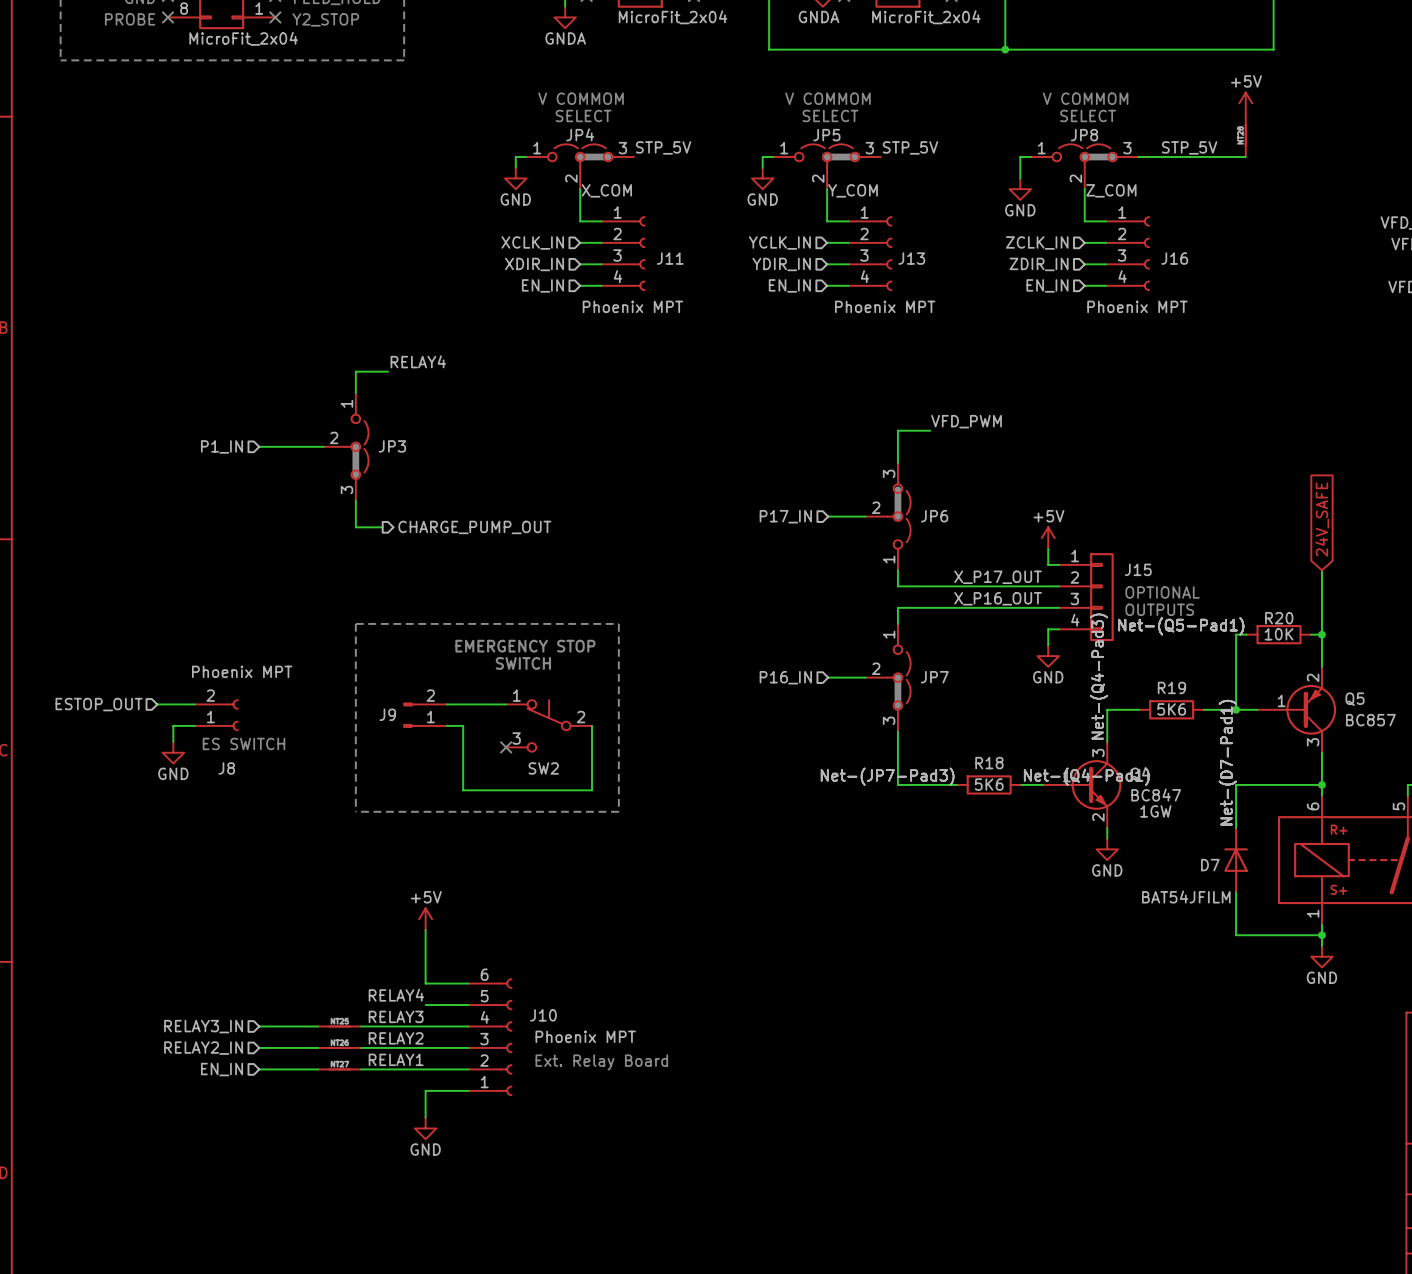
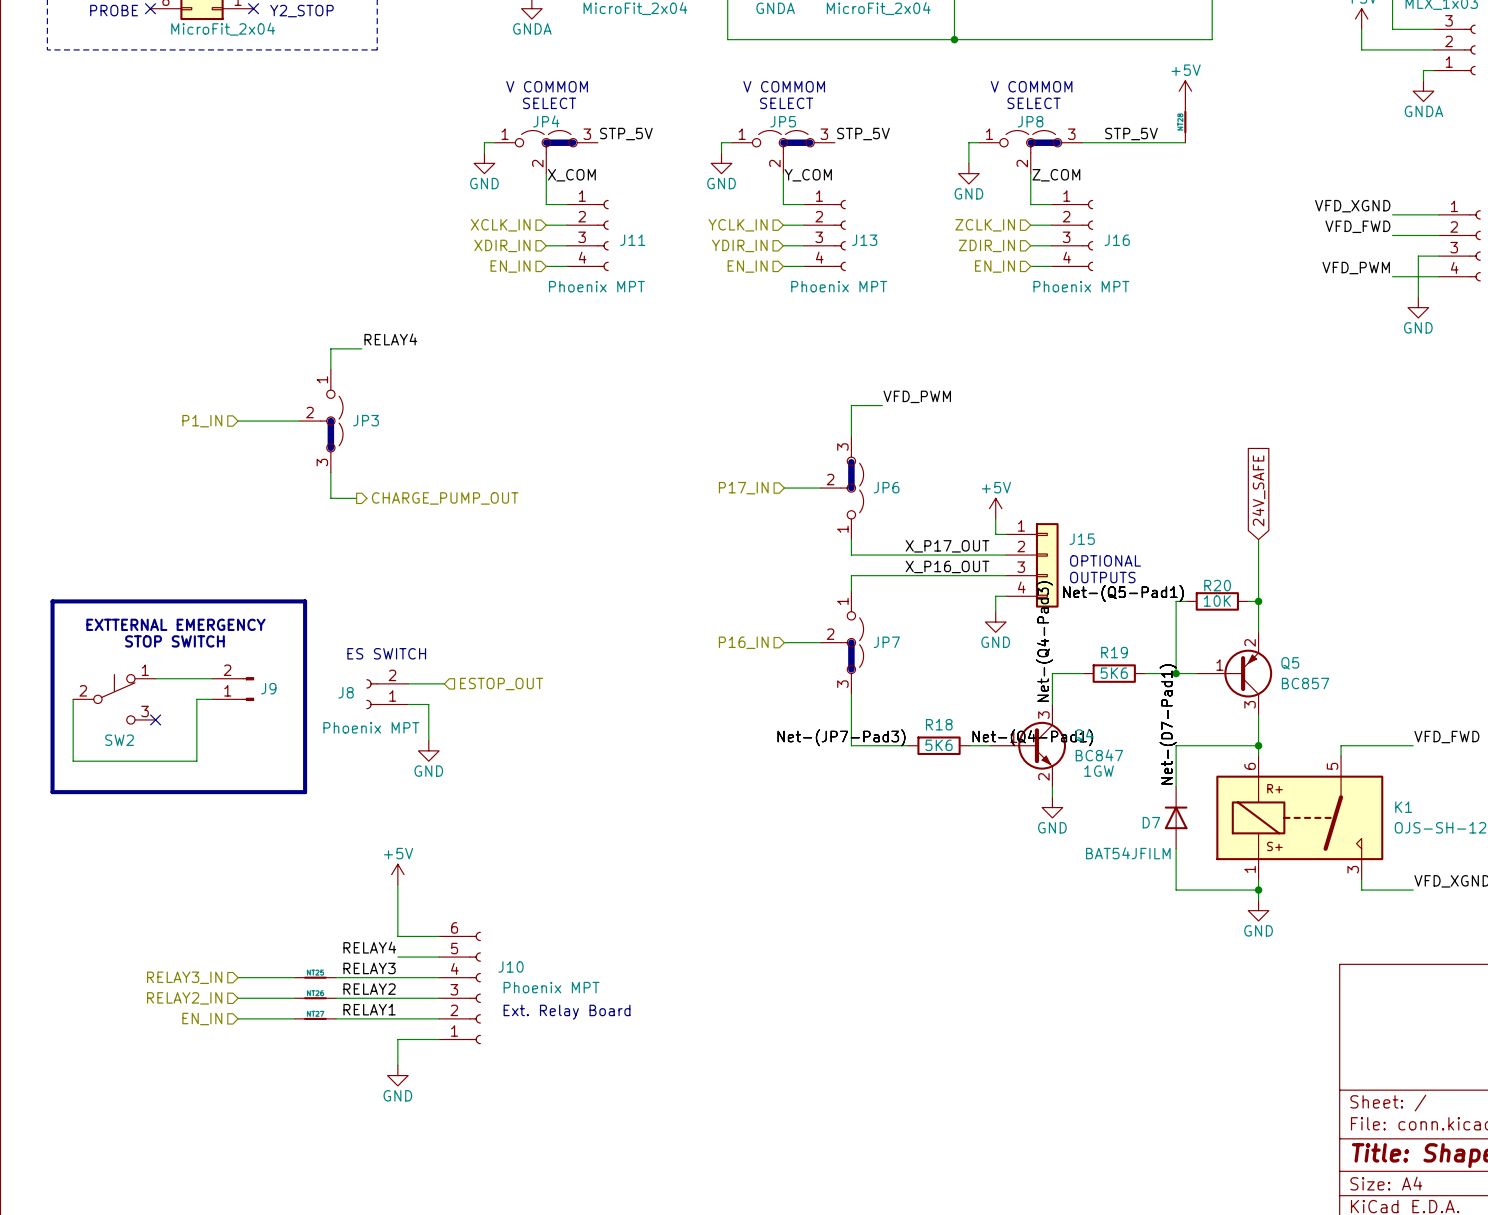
line: (355, 623) (355, 811) (618, 811) (618, 623) (355, 623) -> none
line: none -> (52, 601) (52, 792) (305, 792) (305, 601) (52, 601)
text: EMERGENCY STOP (525, 646) -> none
text: none -> EXTTERNAL EMERGENCY (175, 624)
text: SWITCH (523, 663) -> none
J8 value position: Phoenix MPT (242, 671) -> Phoenix MPT (371, 727)
text: none -> STOP SWITCH (174, 641)
text: none -> ES SWITCH (386, 653)
hierarchical label: ESTOP_OUT (99, 704) -> none
wire: (157, 704) (194, 704) -> none
wire: (447, 704) (506, 704) -> none
wire: none -> (155, 678) (212, 678)
J8 position: (216, 715) -> (387, 694)
J8 flip: as is (232, 715) -> left-right (372, 694)
J9 flip: as is (409, 715) -> left-right (248, 689)
J9 position: (425, 715) -> (233, 689)
wire: none -> (408, 683) (444, 683)
hierarchical label: none -> ESTOP_OUT (501, 683)
wire: (194, 725) (173, 725) (173, 742) -> none
wire: (447, 725) (463, 725) (463, 790) (592, 790) (592, 725) -> none
SW2 flip: as is (549, 725) -> left-right (114, 699)
SW2 position: (549, 725) -> (114, 699)
wire: none -> (73, 699) (73, 761) (196, 761) (196, 699) (212, 699)
wire: none -> (408, 704) (428, 704) (428, 740)
text: ES SWITCH (243, 743) -> none
no-connect mark: (506, 747) -> none
power symbol: GND (173, 752) -> none
no-connect mark: none -> (155, 719)
J8 name position: J8 (226, 768) -> J8 (346, 692)
power symbol: none -> GND (428, 750)

